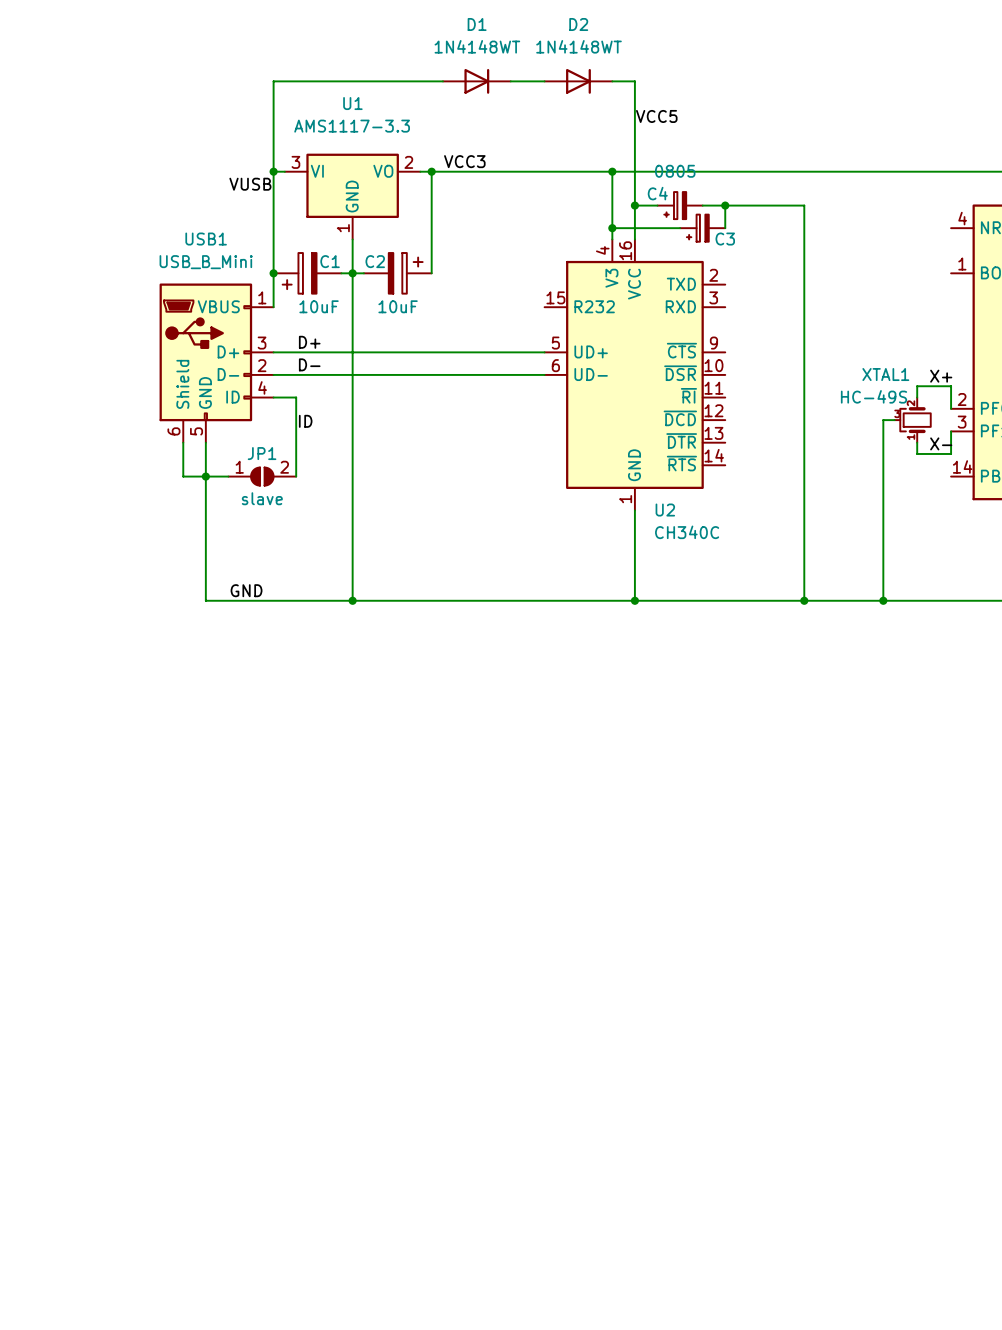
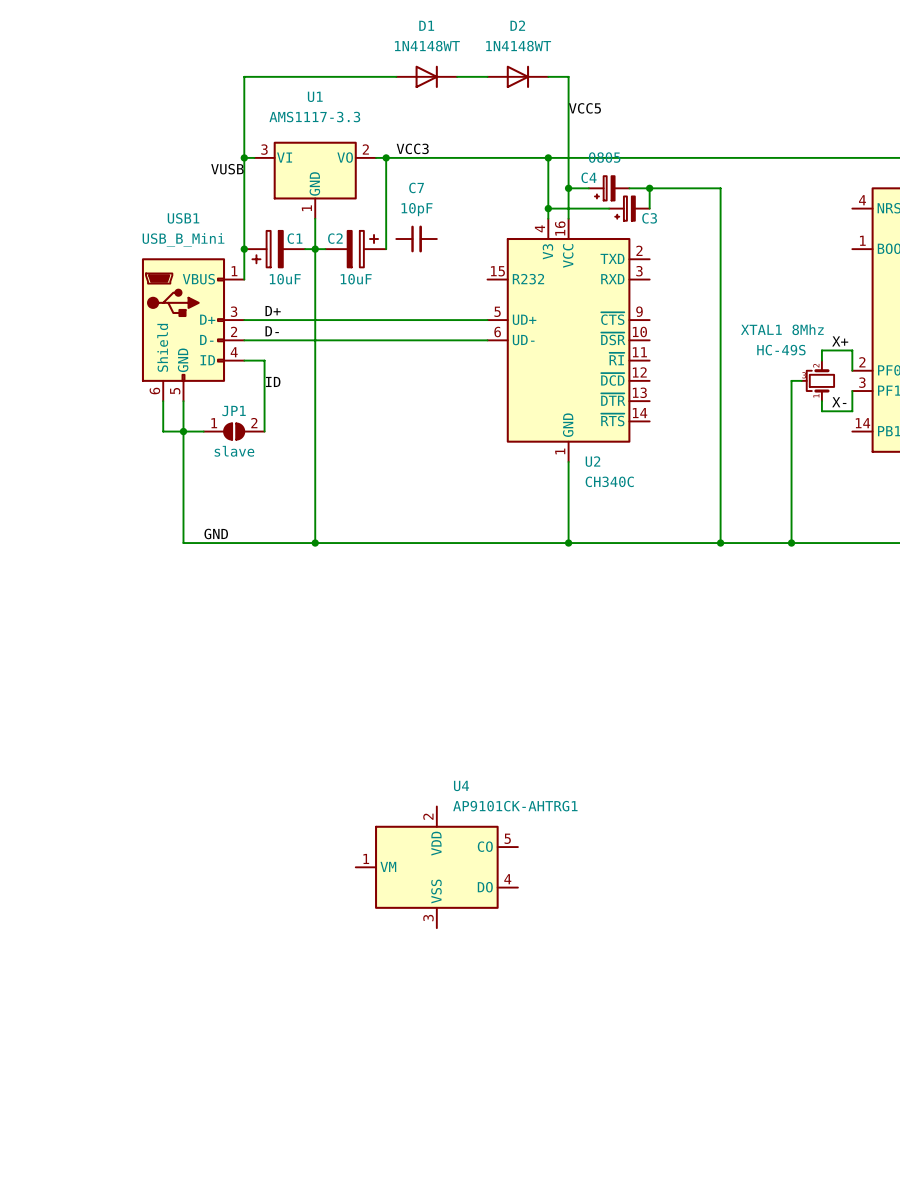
C7: none -> 10pF (416, 239)
XTAL1 name position: XTAL1 (885, 374) -> XTAL1 (761, 329)
XTAL1 text: none -> HC-49S (781, 350)
XTAL1 value: HC-49S (874, 396) -> 8Mhz (808, 329)
U4: none -> AP9101CK-AHTRG1 (436, 867)

